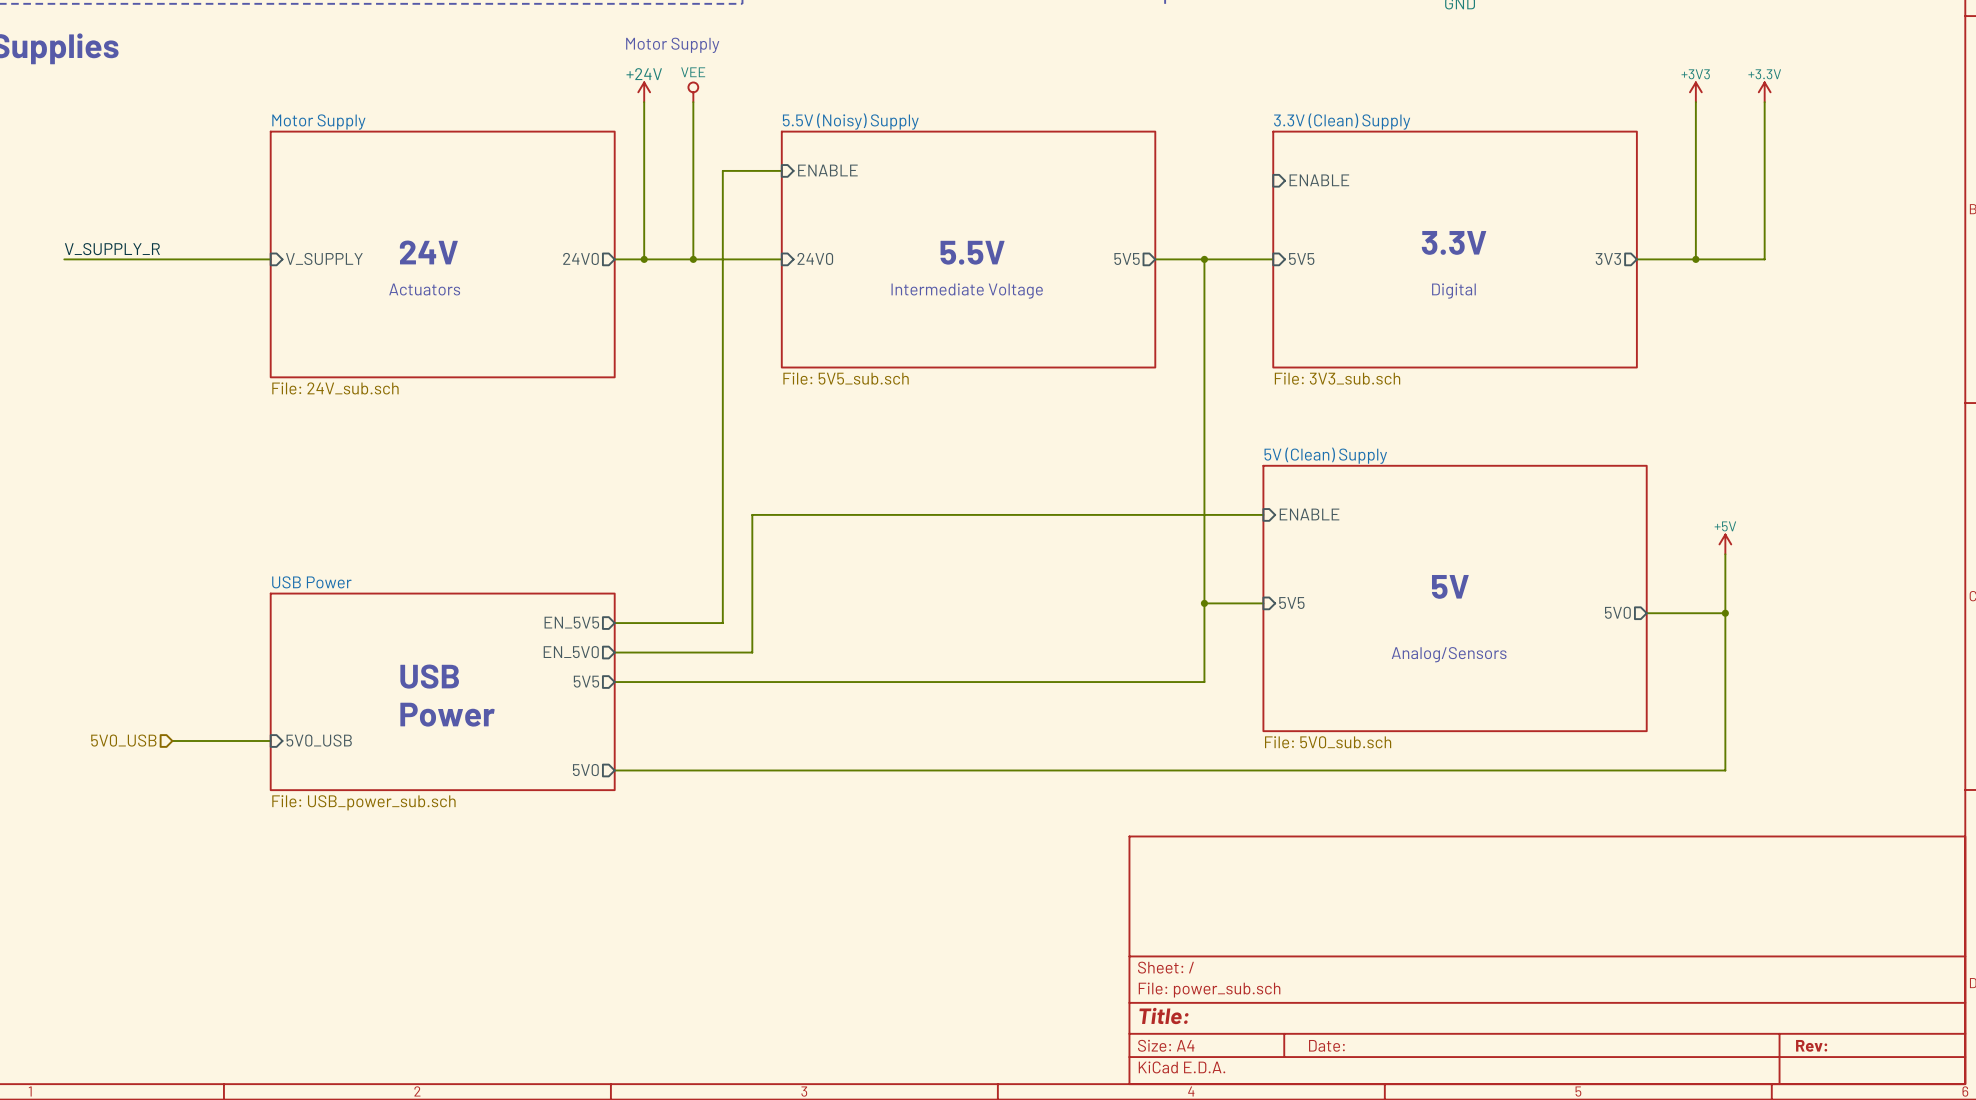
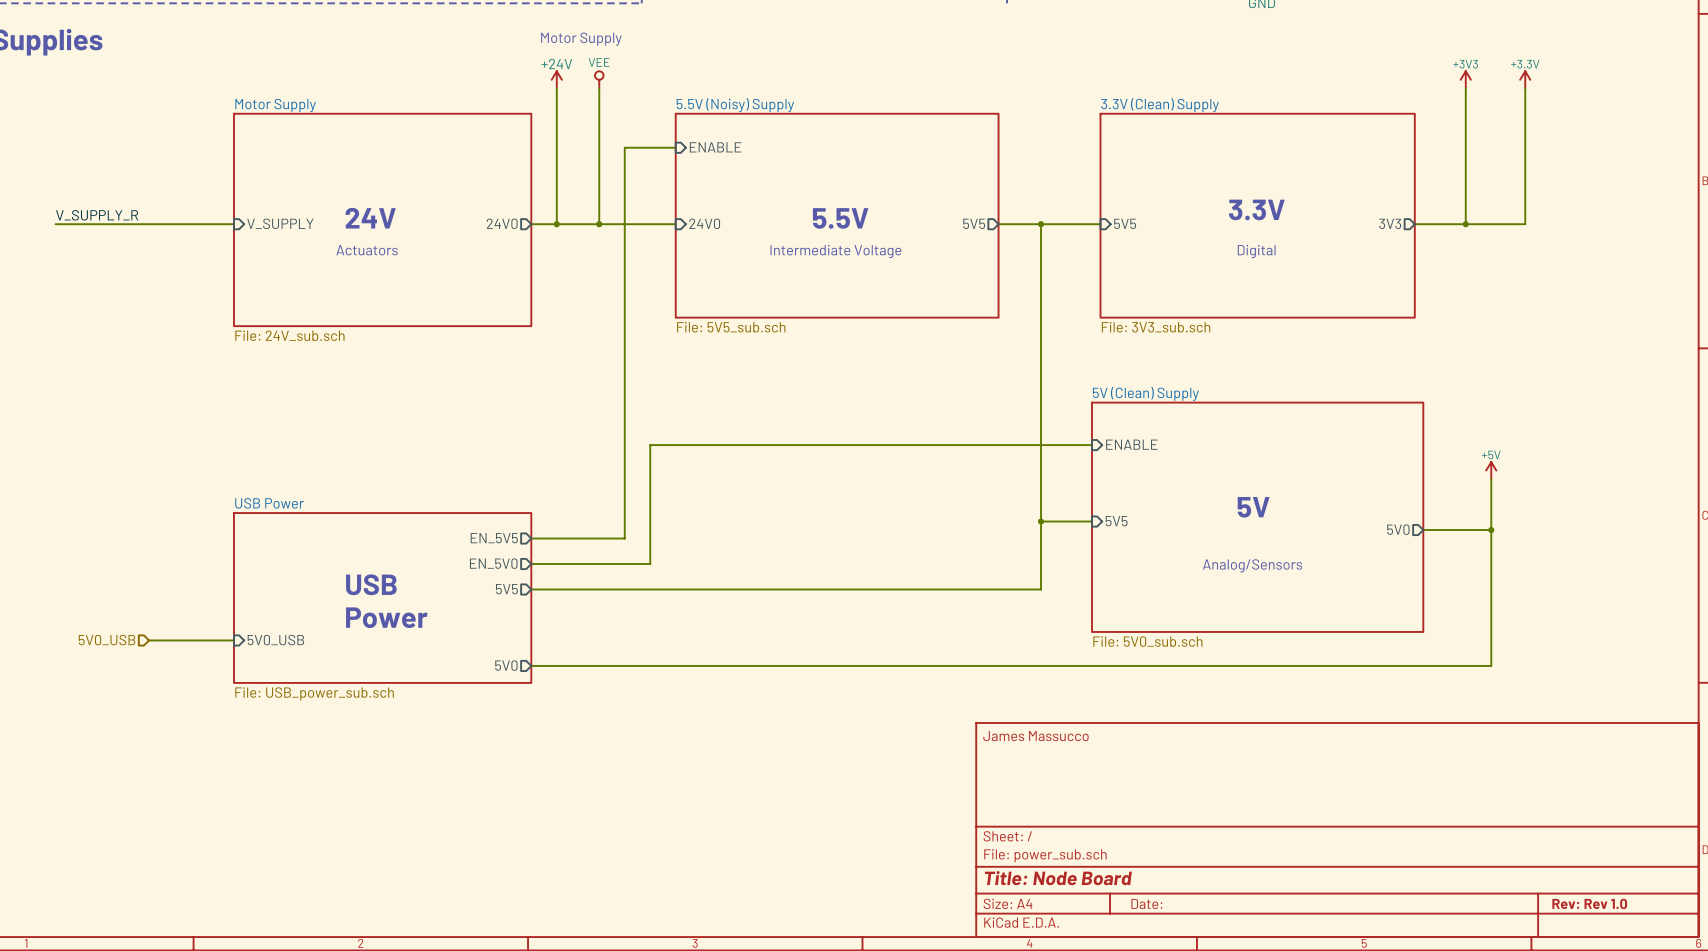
sheet pin: ENABLE (1319, 180) -> none
title block: none -> James Massucco (1035, 736)
title block: Title: (1164, 1015) -> Title: Node Board (1058, 878)
title block: Rev: (1811, 1045) -> Rev: Rev 1.0 (1589, 903)

